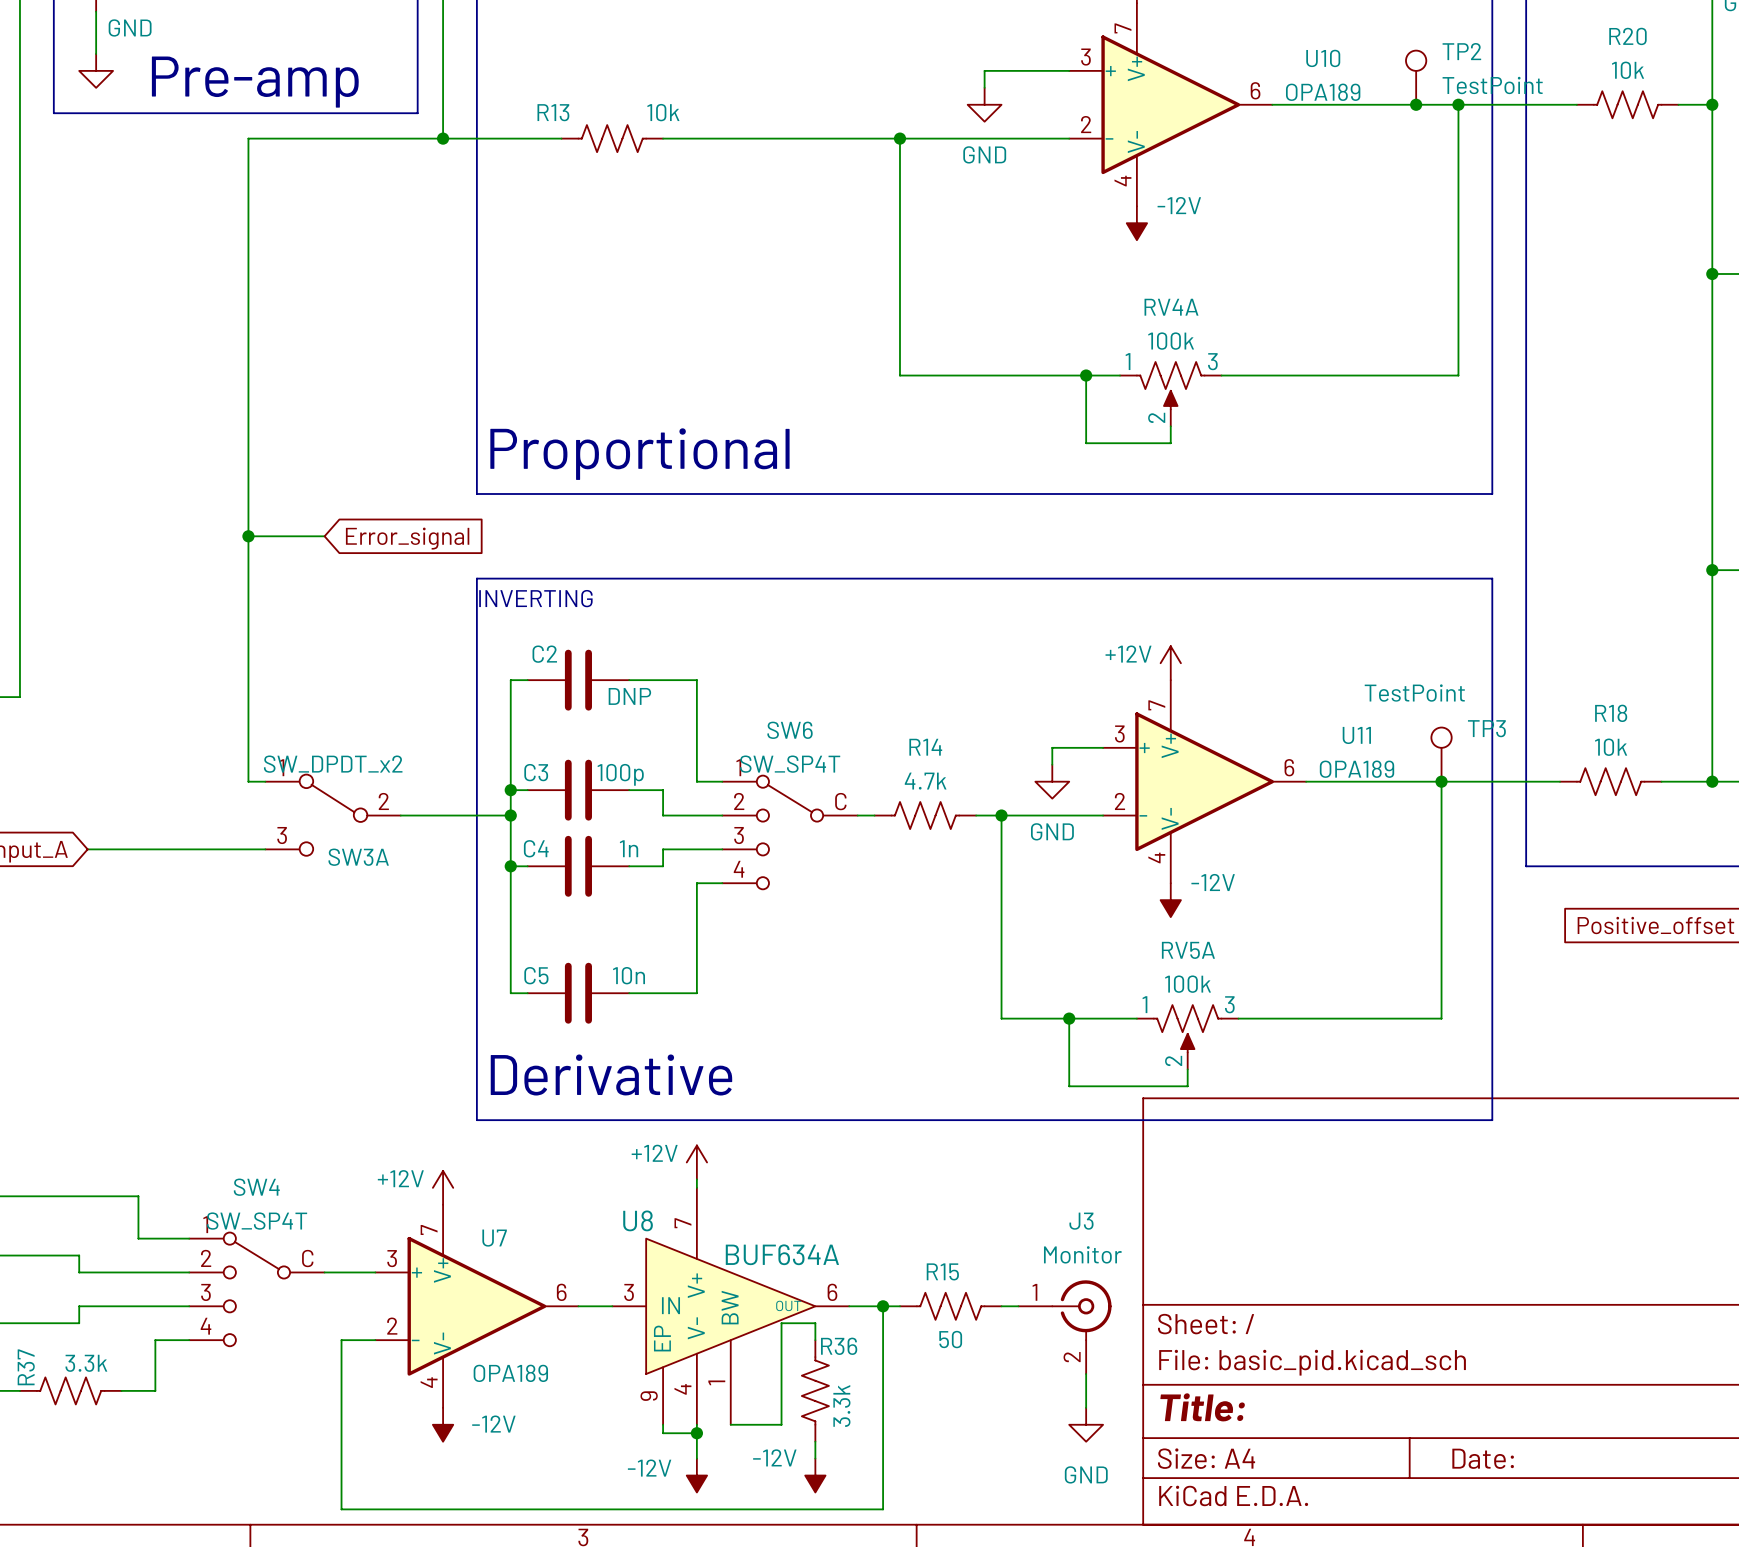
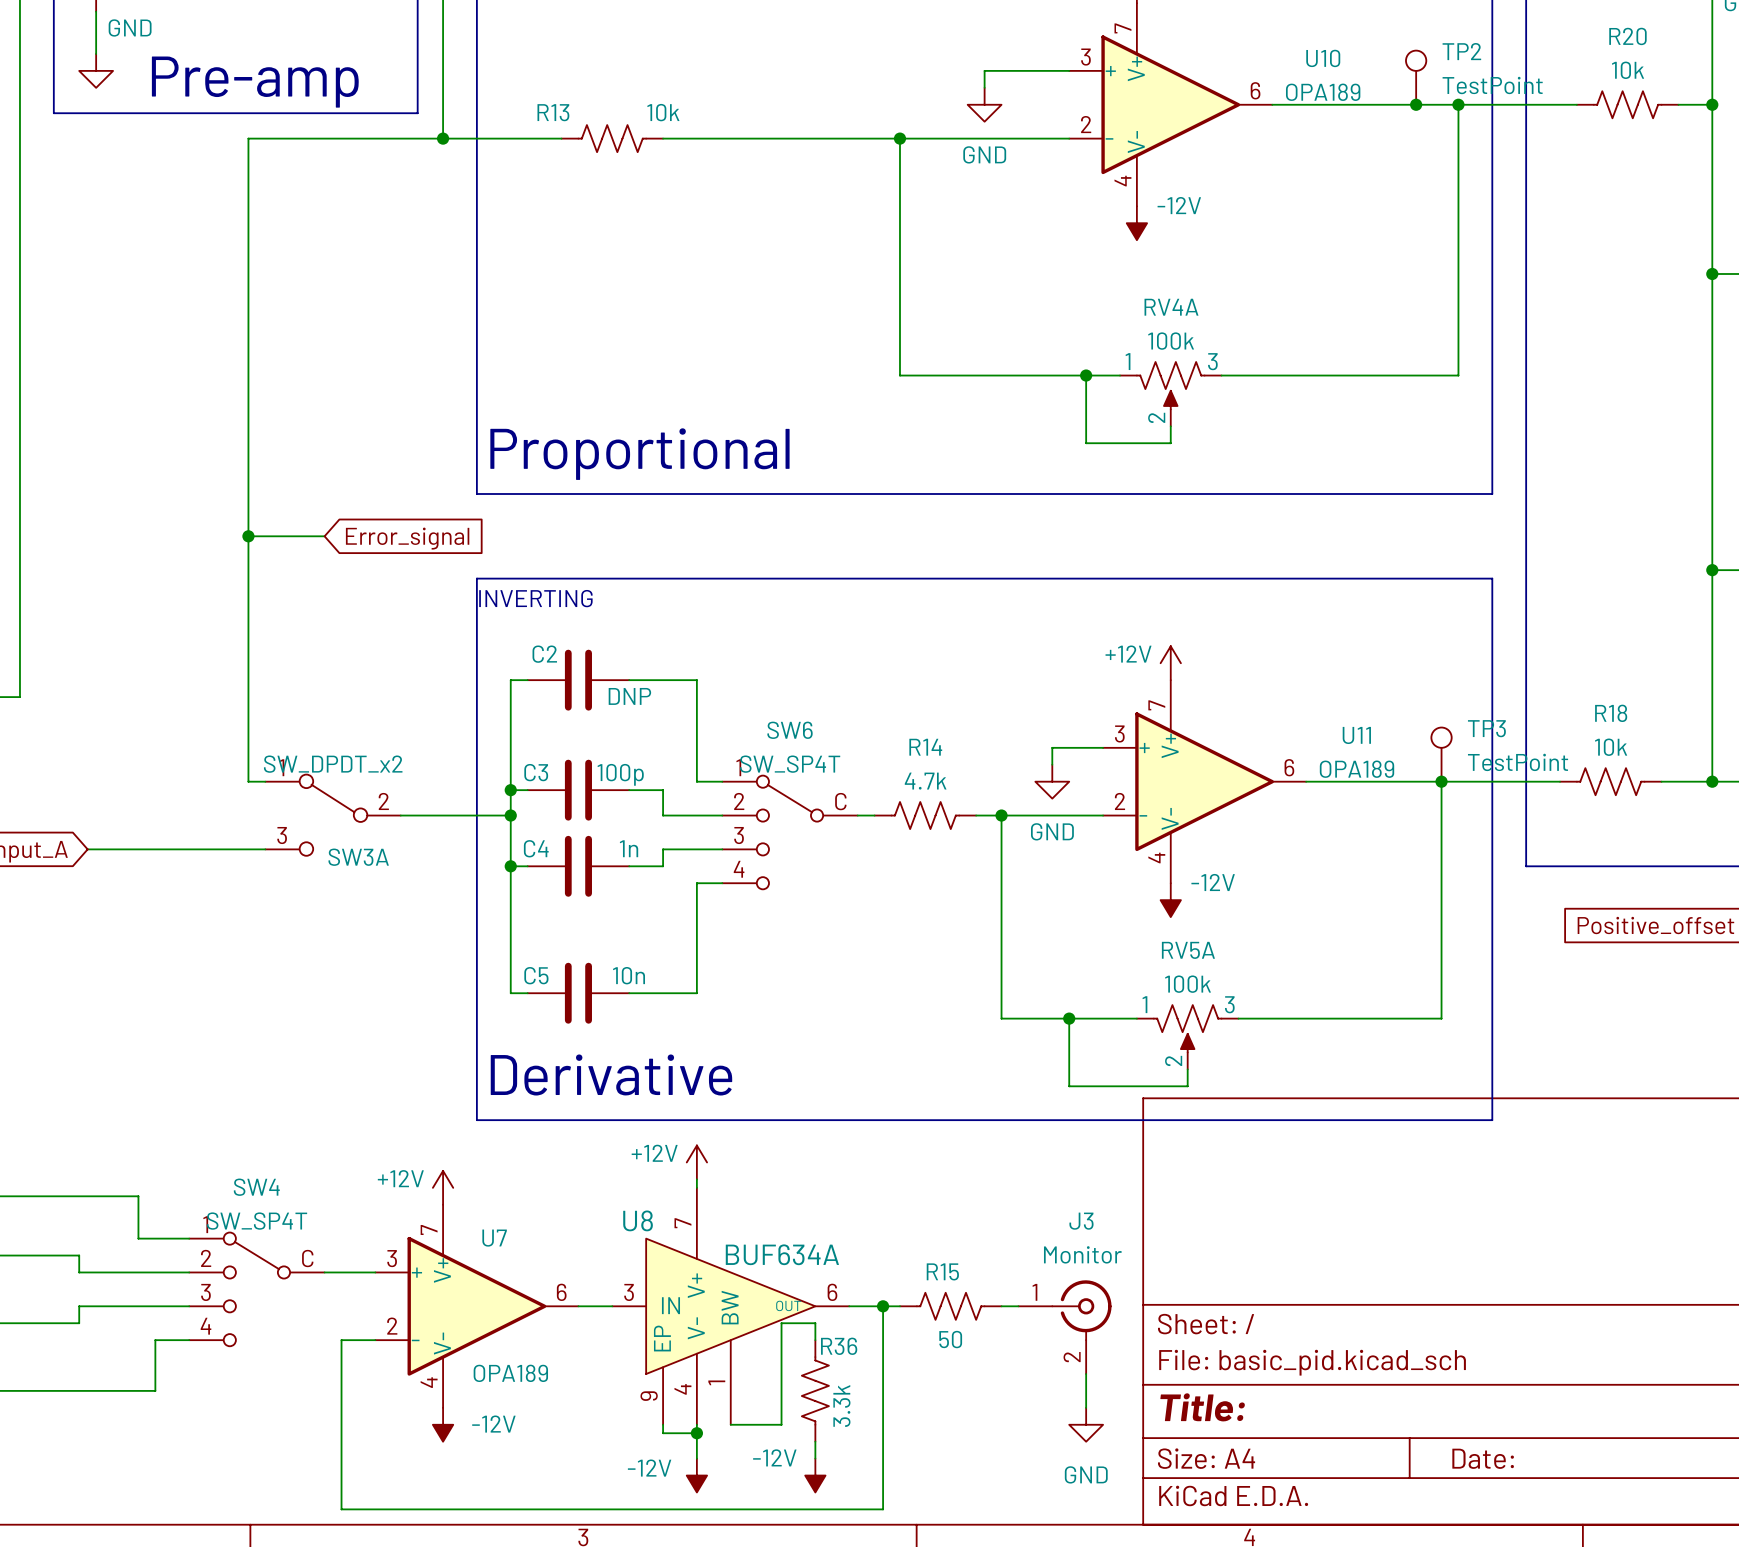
TP3 value position: TestPoint (1414, 693) -> TestPoint (1518, 762)
R37: 3.3k (70, 1390) -> none

